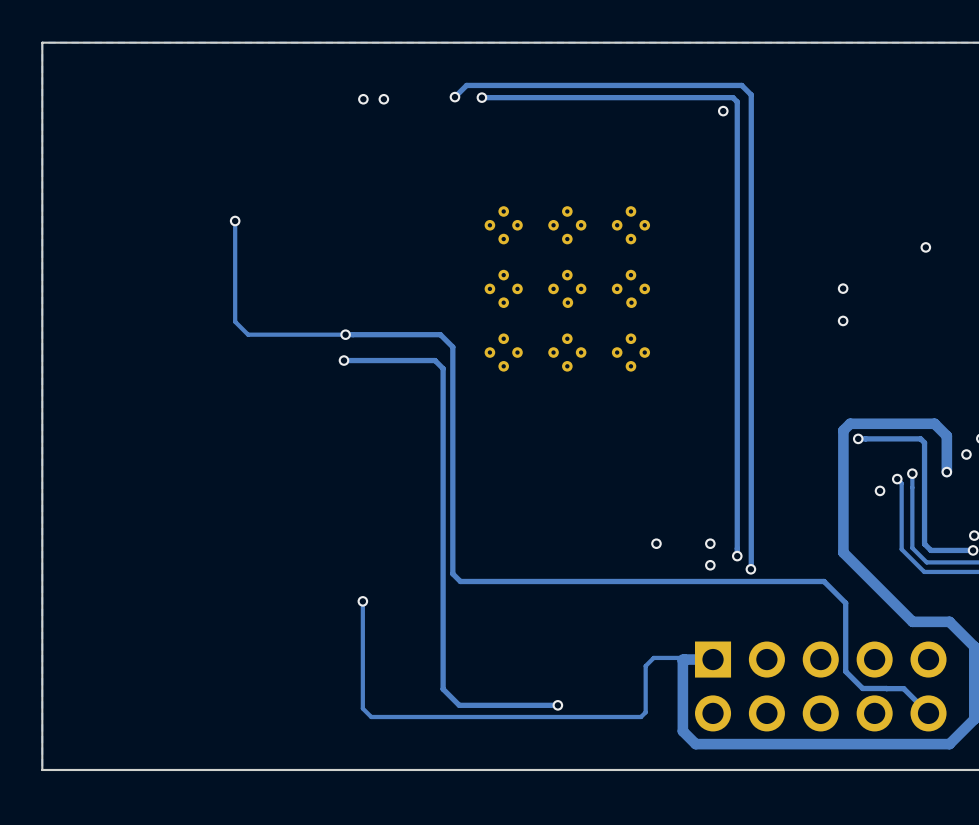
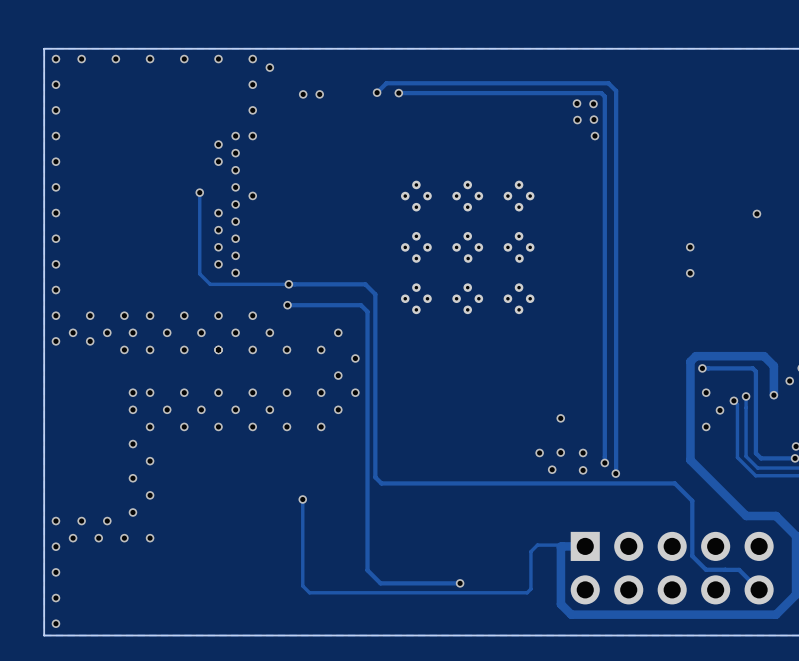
via: none -> (55, 59)
via: none -> (81, 59)
via: none -> (115, 59)
via: none -> (150, 59)
via: none -> (184, 59)
via: none -> (218, 59)
via: none -> (252, 59)
via: none -> (269, 67)
via: none -> (55, 84)
via: none -> (252, 84)
via: none -> (577, 103)
via: none -> (55, 110)
via: none -> (252, 110)
via: none -> (593, 119)
via: none -> (577, 120)
via: none -> (55, 136)
via: none -> (235, 136)
via: none -> (252, 136)
via: none -> (594, 136)
via: none -> (218, 144)
via: none -> (235, 153)
via: none -> (55, 161)
via: none -> (218, 161)
via: none -> (235, 170)
via: none -> (55, 187)
via: none -> (235, 187)
via: none -> (252, 195)
via: none -> (235, 204)
via: none -> (55, 213)
via: none -> (218, 213)
via: none -> (235, 221)
via: none -> (218, 230)
via: none -> (55, 238)
via: none -> (235, 238)
via: none -> (218, 247)
via: none -> (235, 255)
via: none -> (55, 264)
via: none -> (218, 264)
via: none -> (235, 272)
via: none -> (55, 290)
via: none -> (55, 315)
via: none -> (90, 315)
via: none -> (124, 315)
via: none -> (150, 315)
via: none -> (184, 315)
via: none -> (218, 315)
via: none -> (252, 315)
via: none -> (73, 332)
via: none -> (107, 332)
via: none -> (132, 332)
via: none -> (167, 332)
via: none -> (201, 332)
via: none -> (235, 332)
via: none -> (269, 332)
via: none -> (338, 332)
via: none -> (55, 341)
via: none -> (90, 341)
via: none -> (124, 349)
via: none -> (150, 349)
via: none -> (184, 349)
via: none -> (218, 349)
via: none -> (252, 349)
via: none -> (286, 349)
via: none -> (321, 349)
via: none -> (355, 358)
via: none -> (338, 375)
via: none -> (132, 392)
via: none -> (150, 392)
via: none -> (184, 392)
via: none -> (218, 392)
via: none -> (252, 392)
via: none -> (286, 392)
via: none -> (321, 392)
via: none -> (355, 392)
via: none -> (706, 392)
via: none -> (132, 409)
via: none -> (167, 409)
via: none -> (201, 409)
via: none -> (235, 409)
via: none -> (269, 409)
via: none -> (338, 409)
via: none -> (560, 418)
via: none -> (150, 426)
via: none -> (184, 426)
via: none -> (218, 426)
via: none -> (252, 426)
via: none -> (286, 426)
via: none -> (321, 426)
via: none -> (706, 426)
via: none -> (132, 444)
via: none -> (560, 452)
via: none -> (150, 461)
via: none -> (552, 469)
via: none -> (132, 478)
via: none -> (150, 495)
via: none -> (132, 512)
via: none -> (55, 521)
via: none -> (81, 521)
via: none -> (107, 521)
via: none -> (73, 538)
via: none -> (98, 538)
via: none -> (124, 538)
via: none -> (150, 538)
via: none -> (55, 546)
via: none -> (55, 572)
via: none -> (55, 598)
via: none -> (55, 623)

